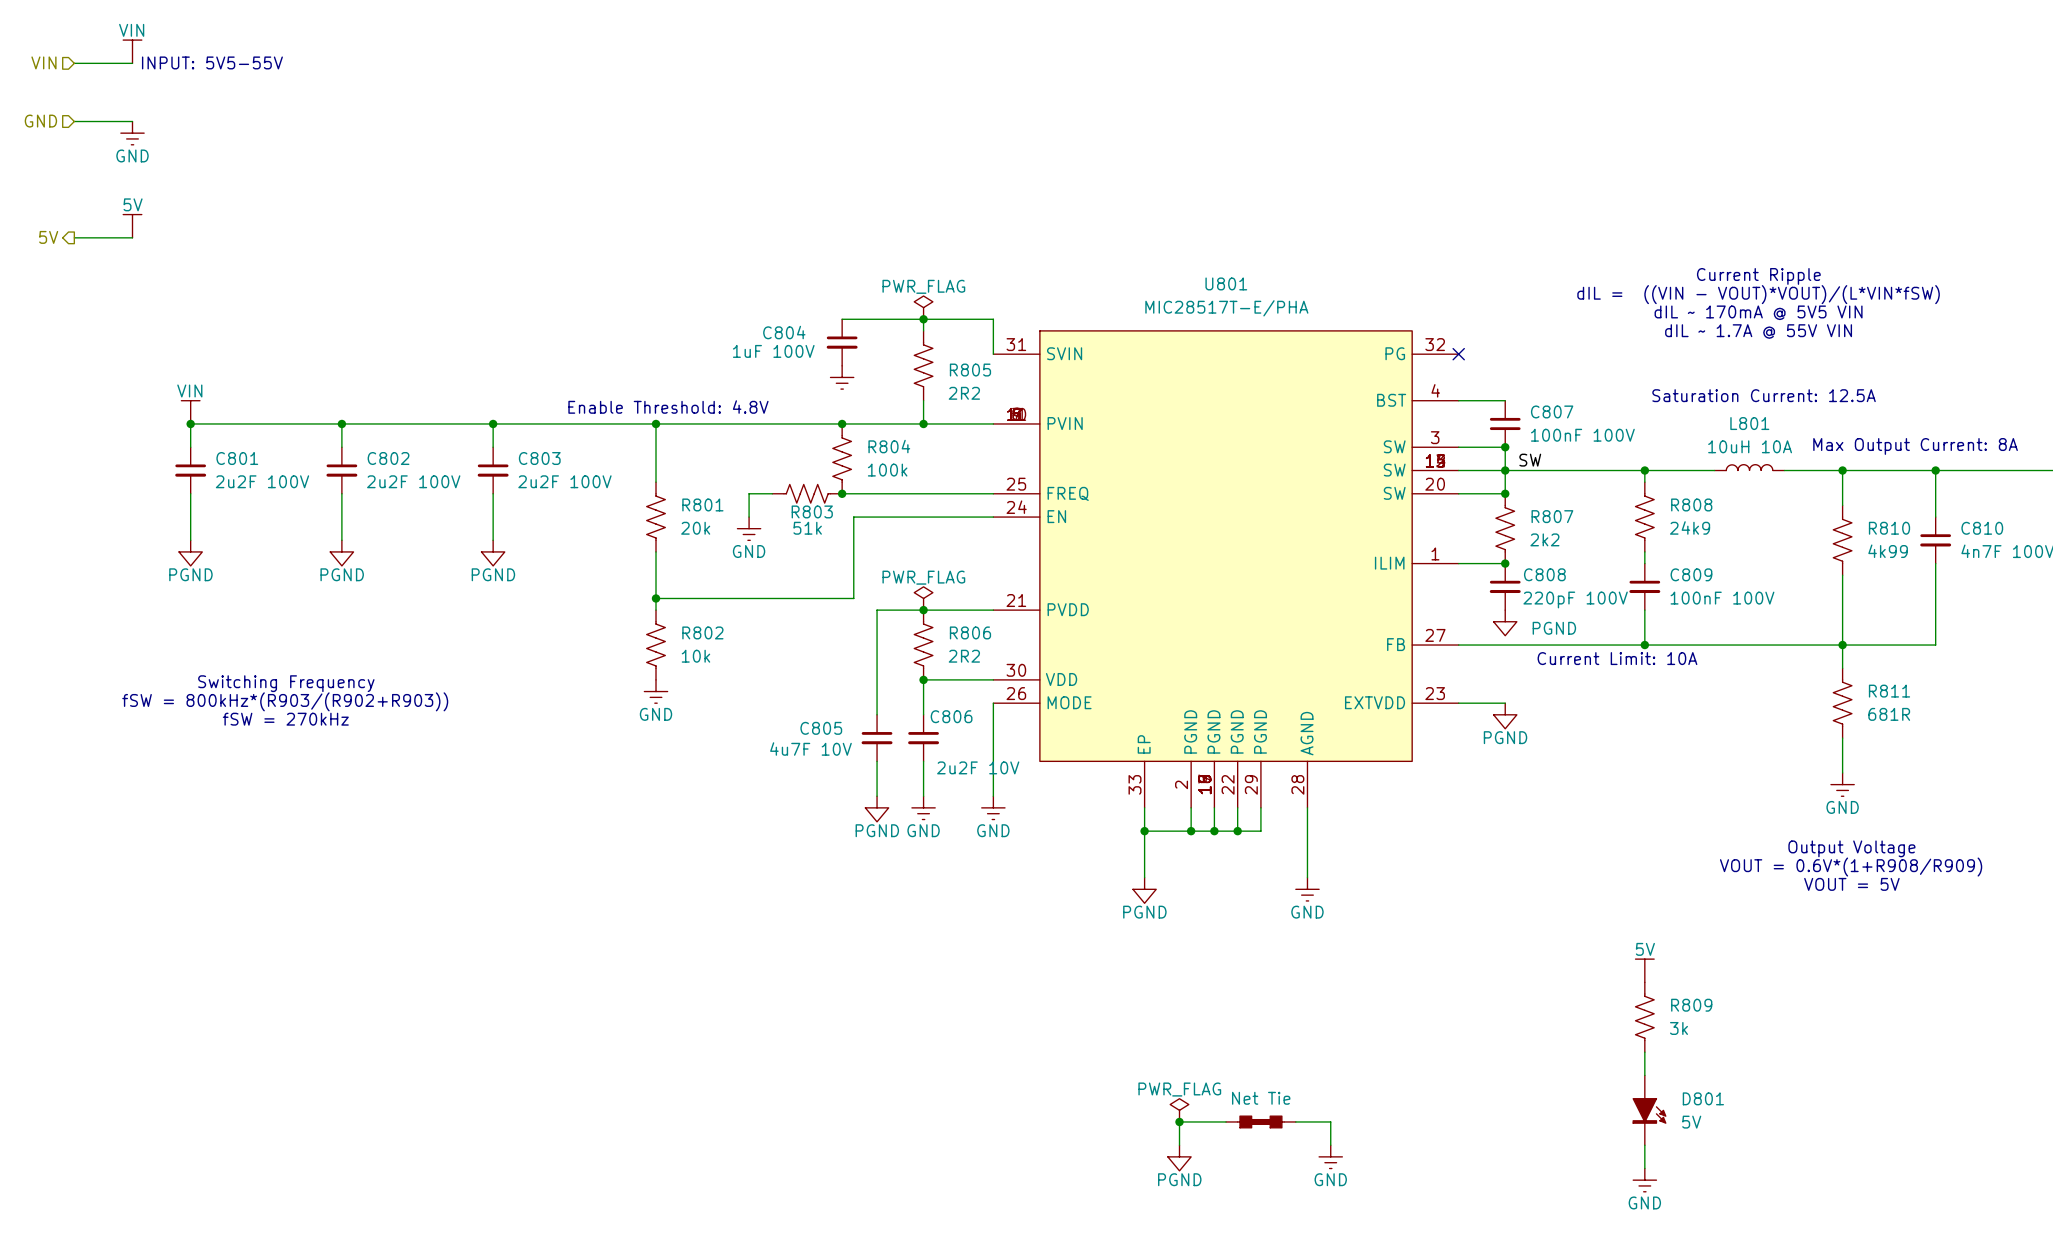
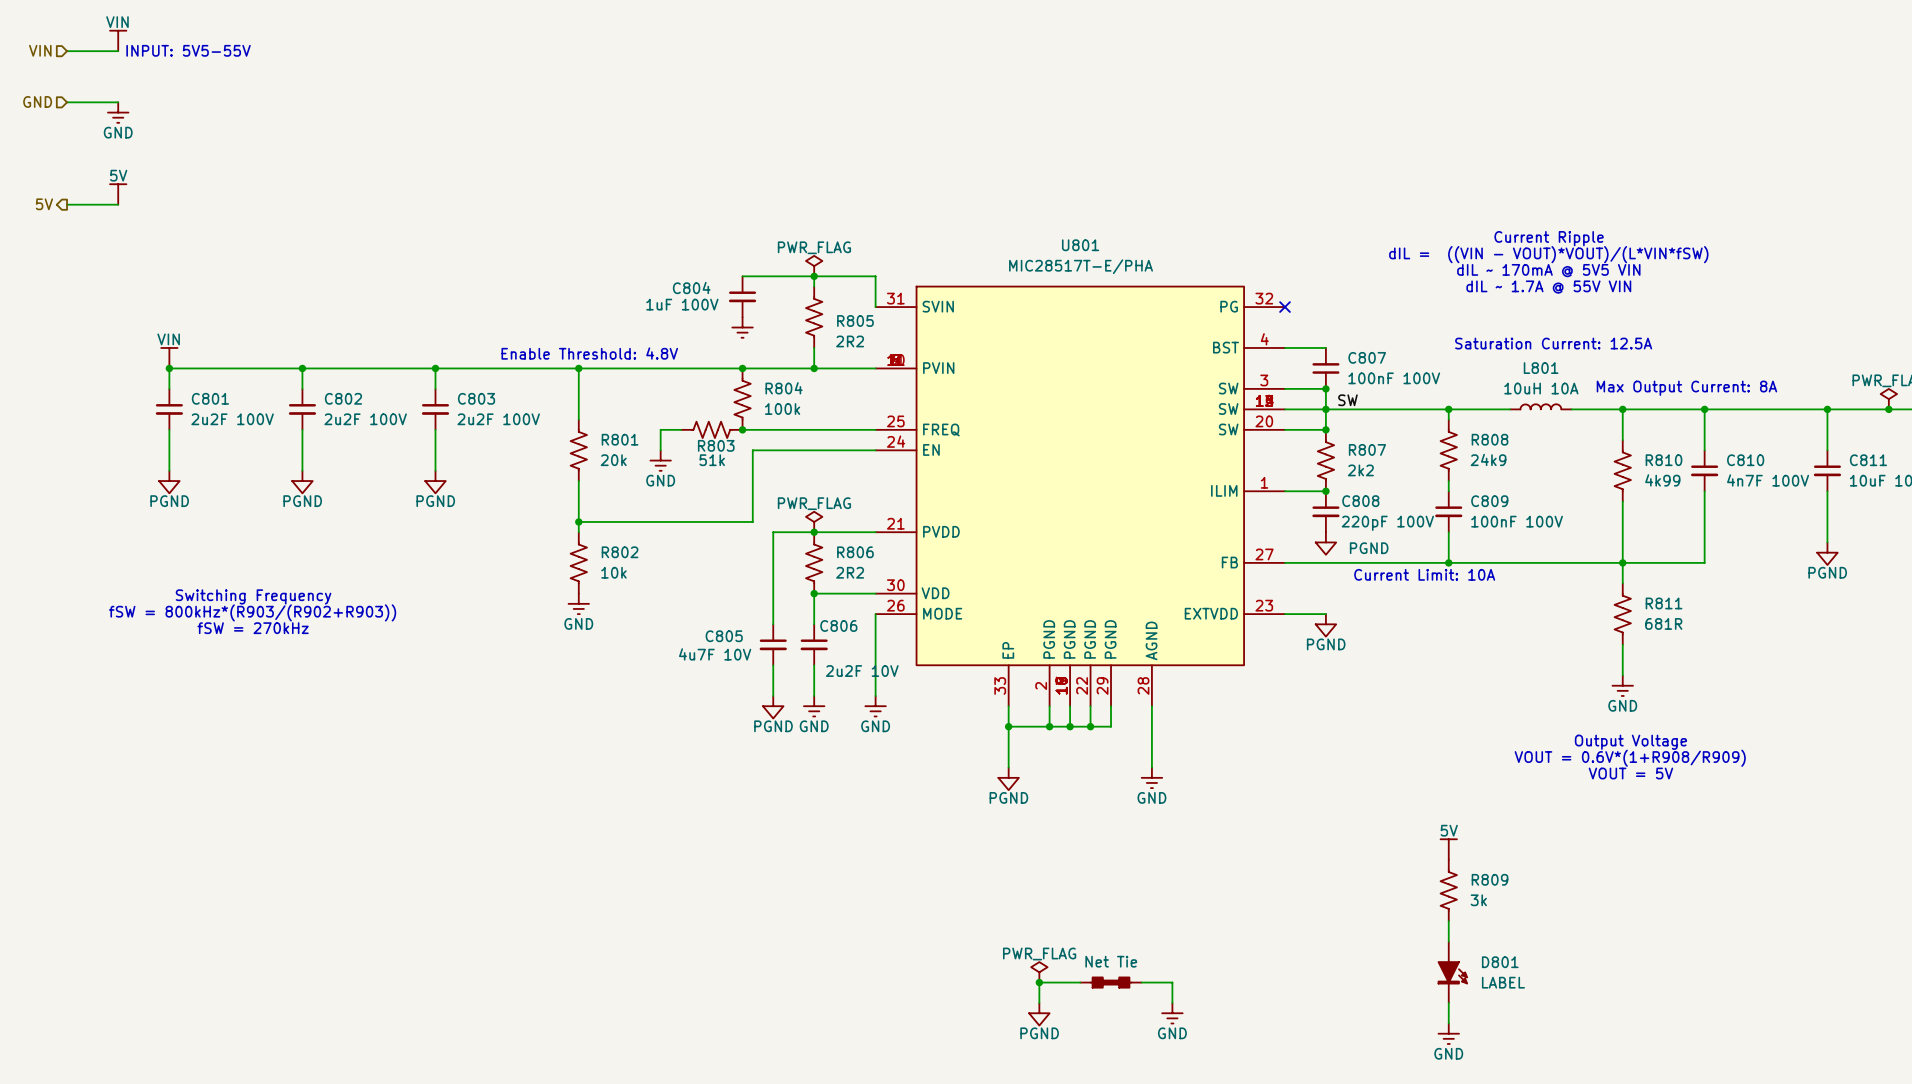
D801 value: 5V (1691, 1122) -> LABEL (1503, 982)

